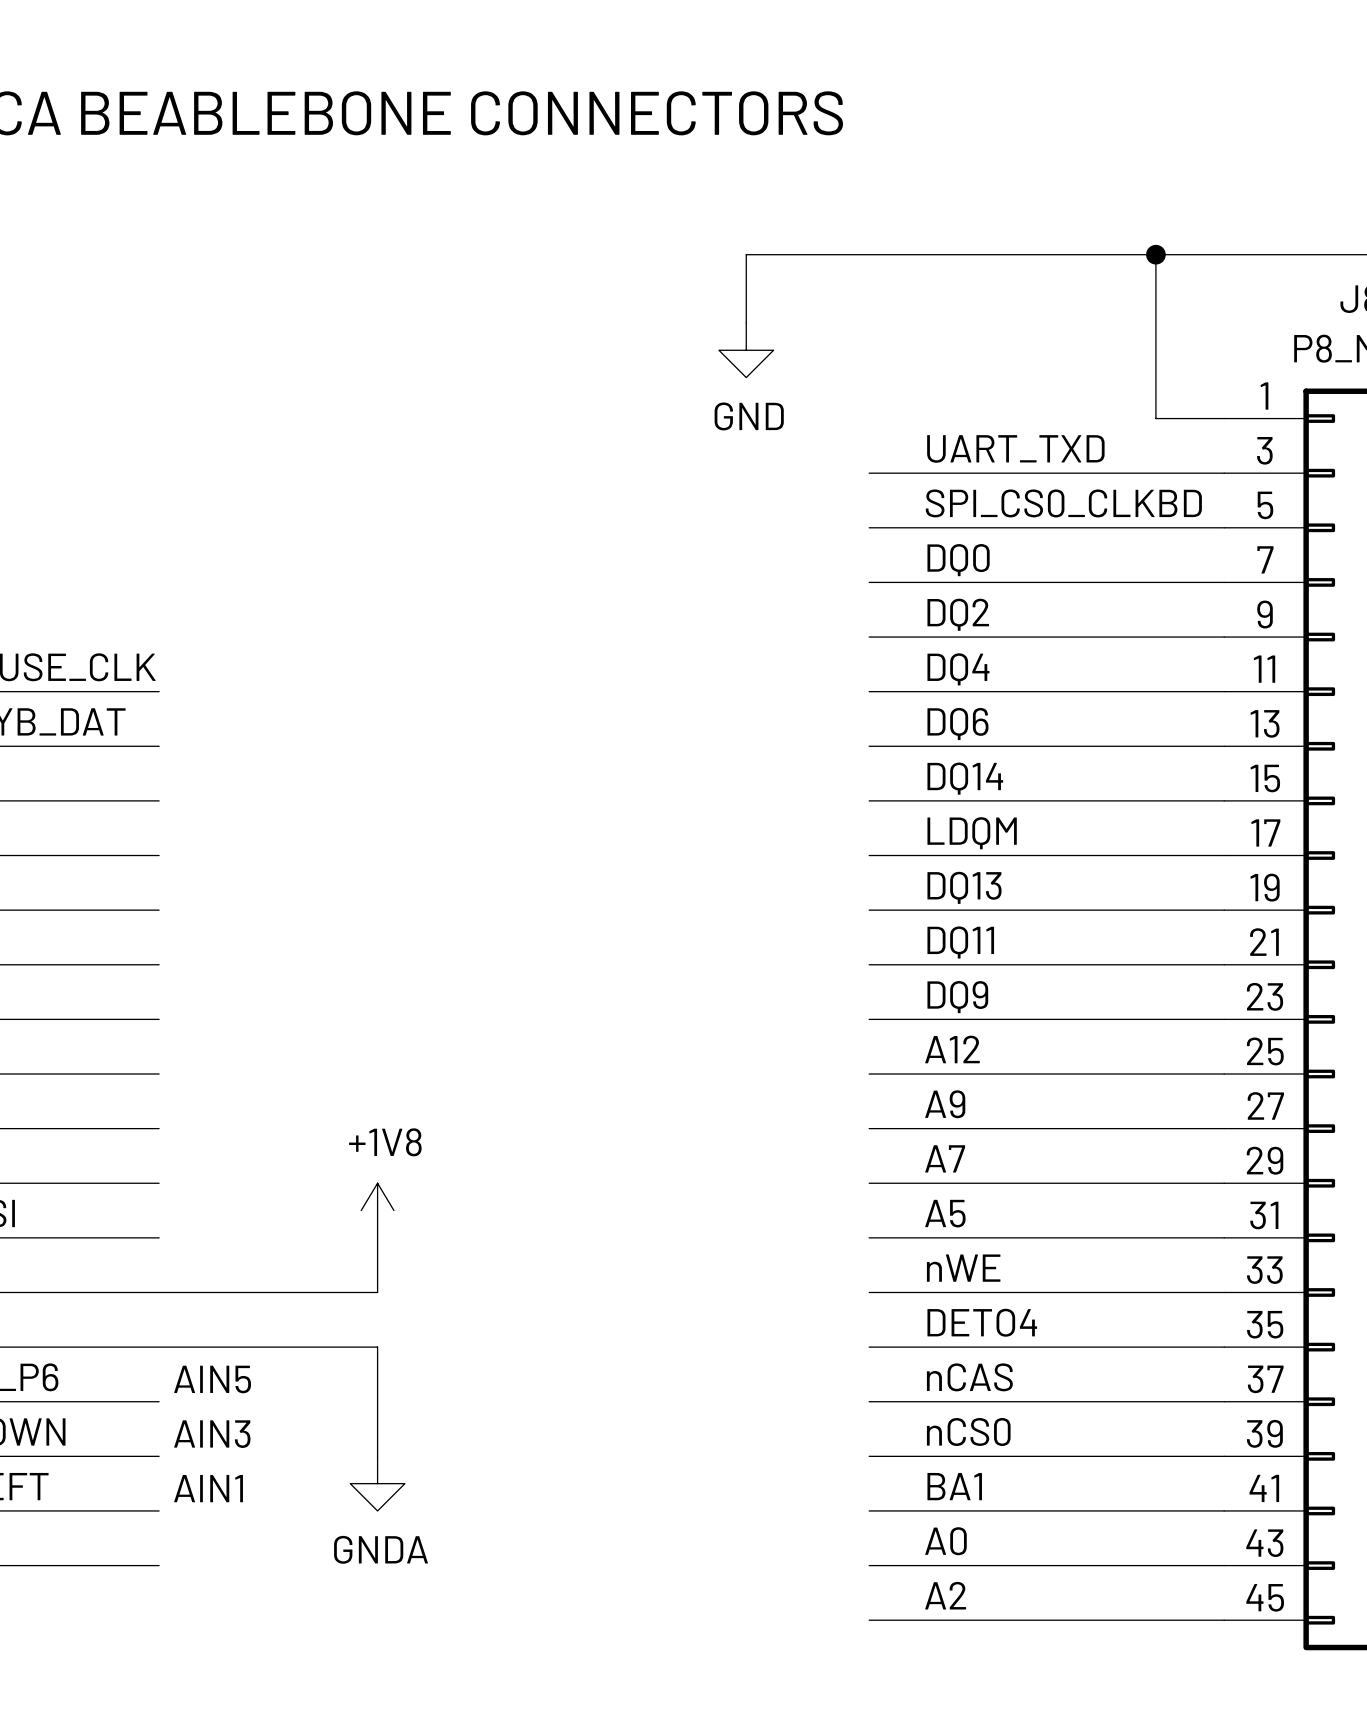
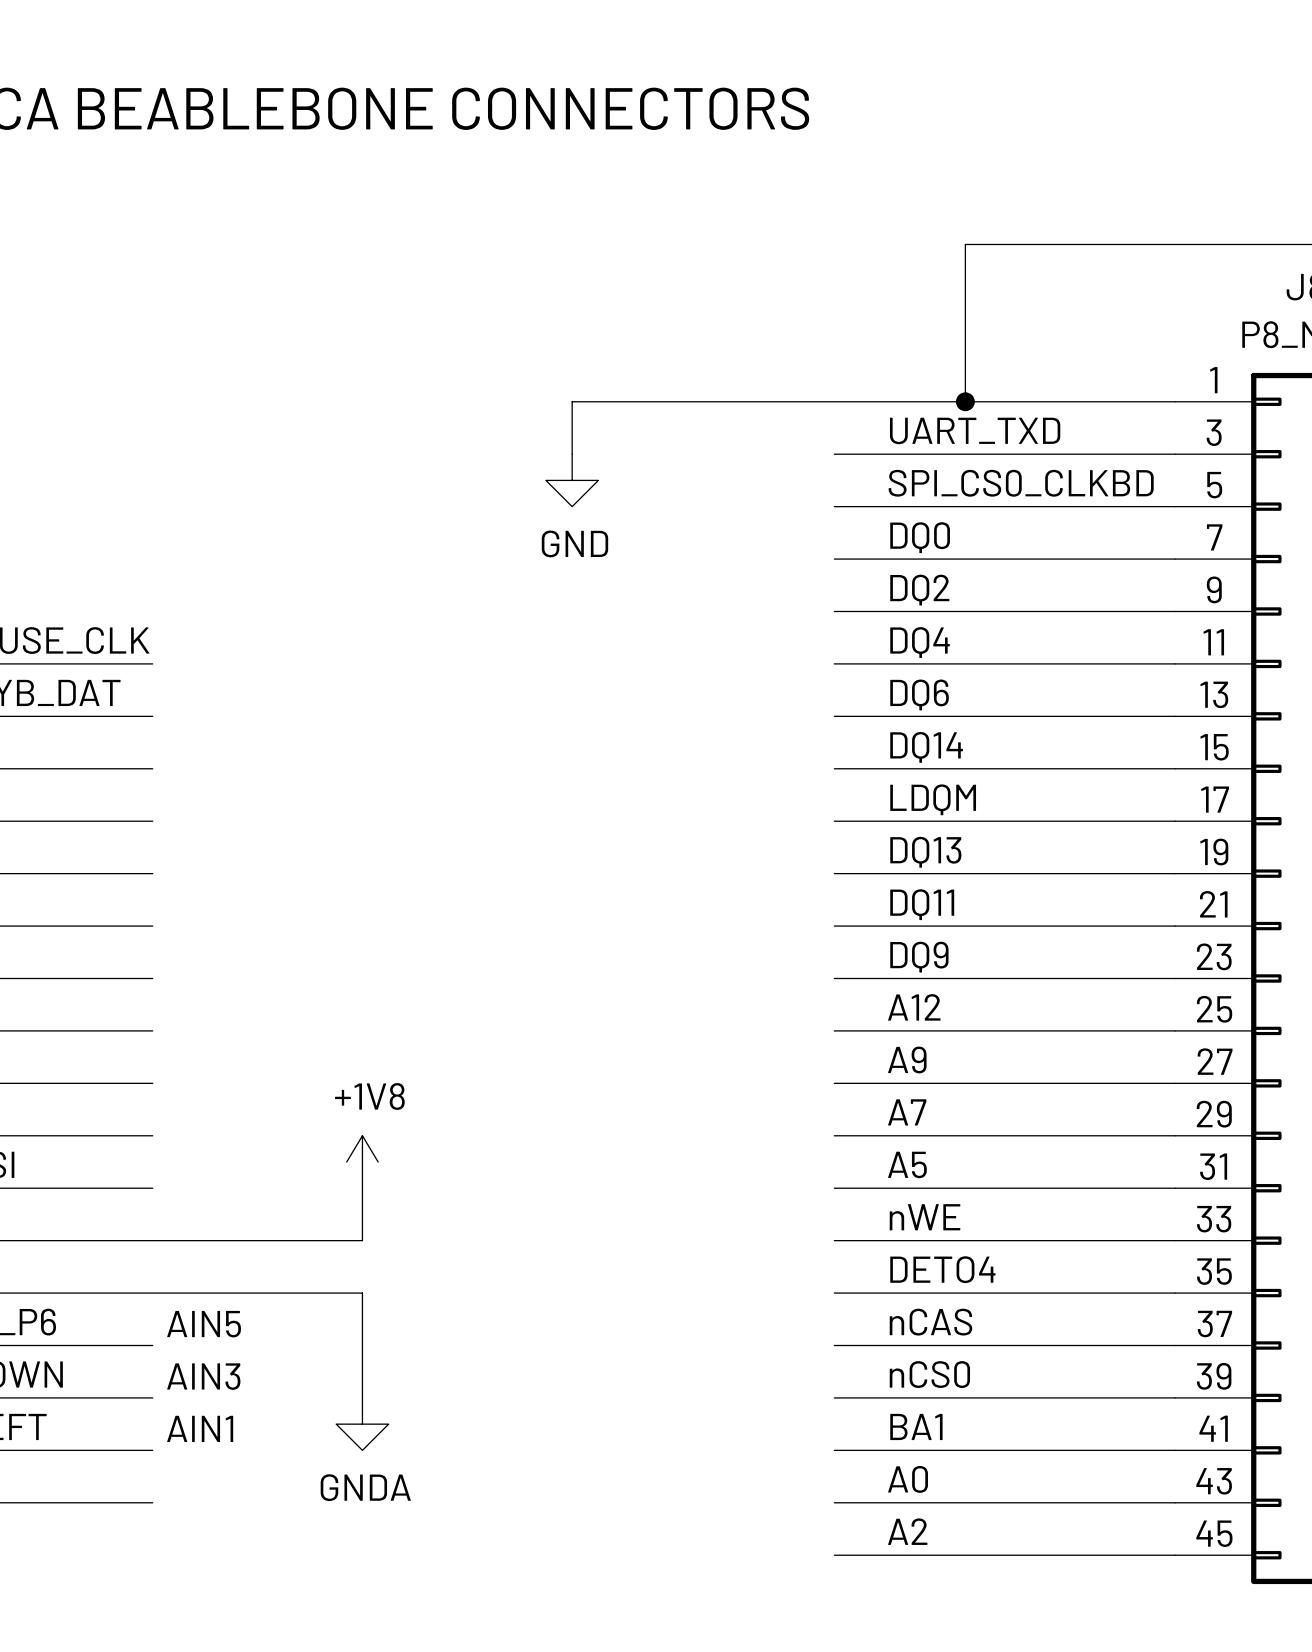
wire: (1005, 254) (746, 254) (746, 322) -> (965, 244) (965, 401)
wire: (1155, 254) (1155, 418) -> (572, 454) (572, 401) (1109, 401)
junction: (1155, 254) -> none
power symbol position: GND (746, 350) -> GND (572, 480)
junction: none -> (965, 401)

